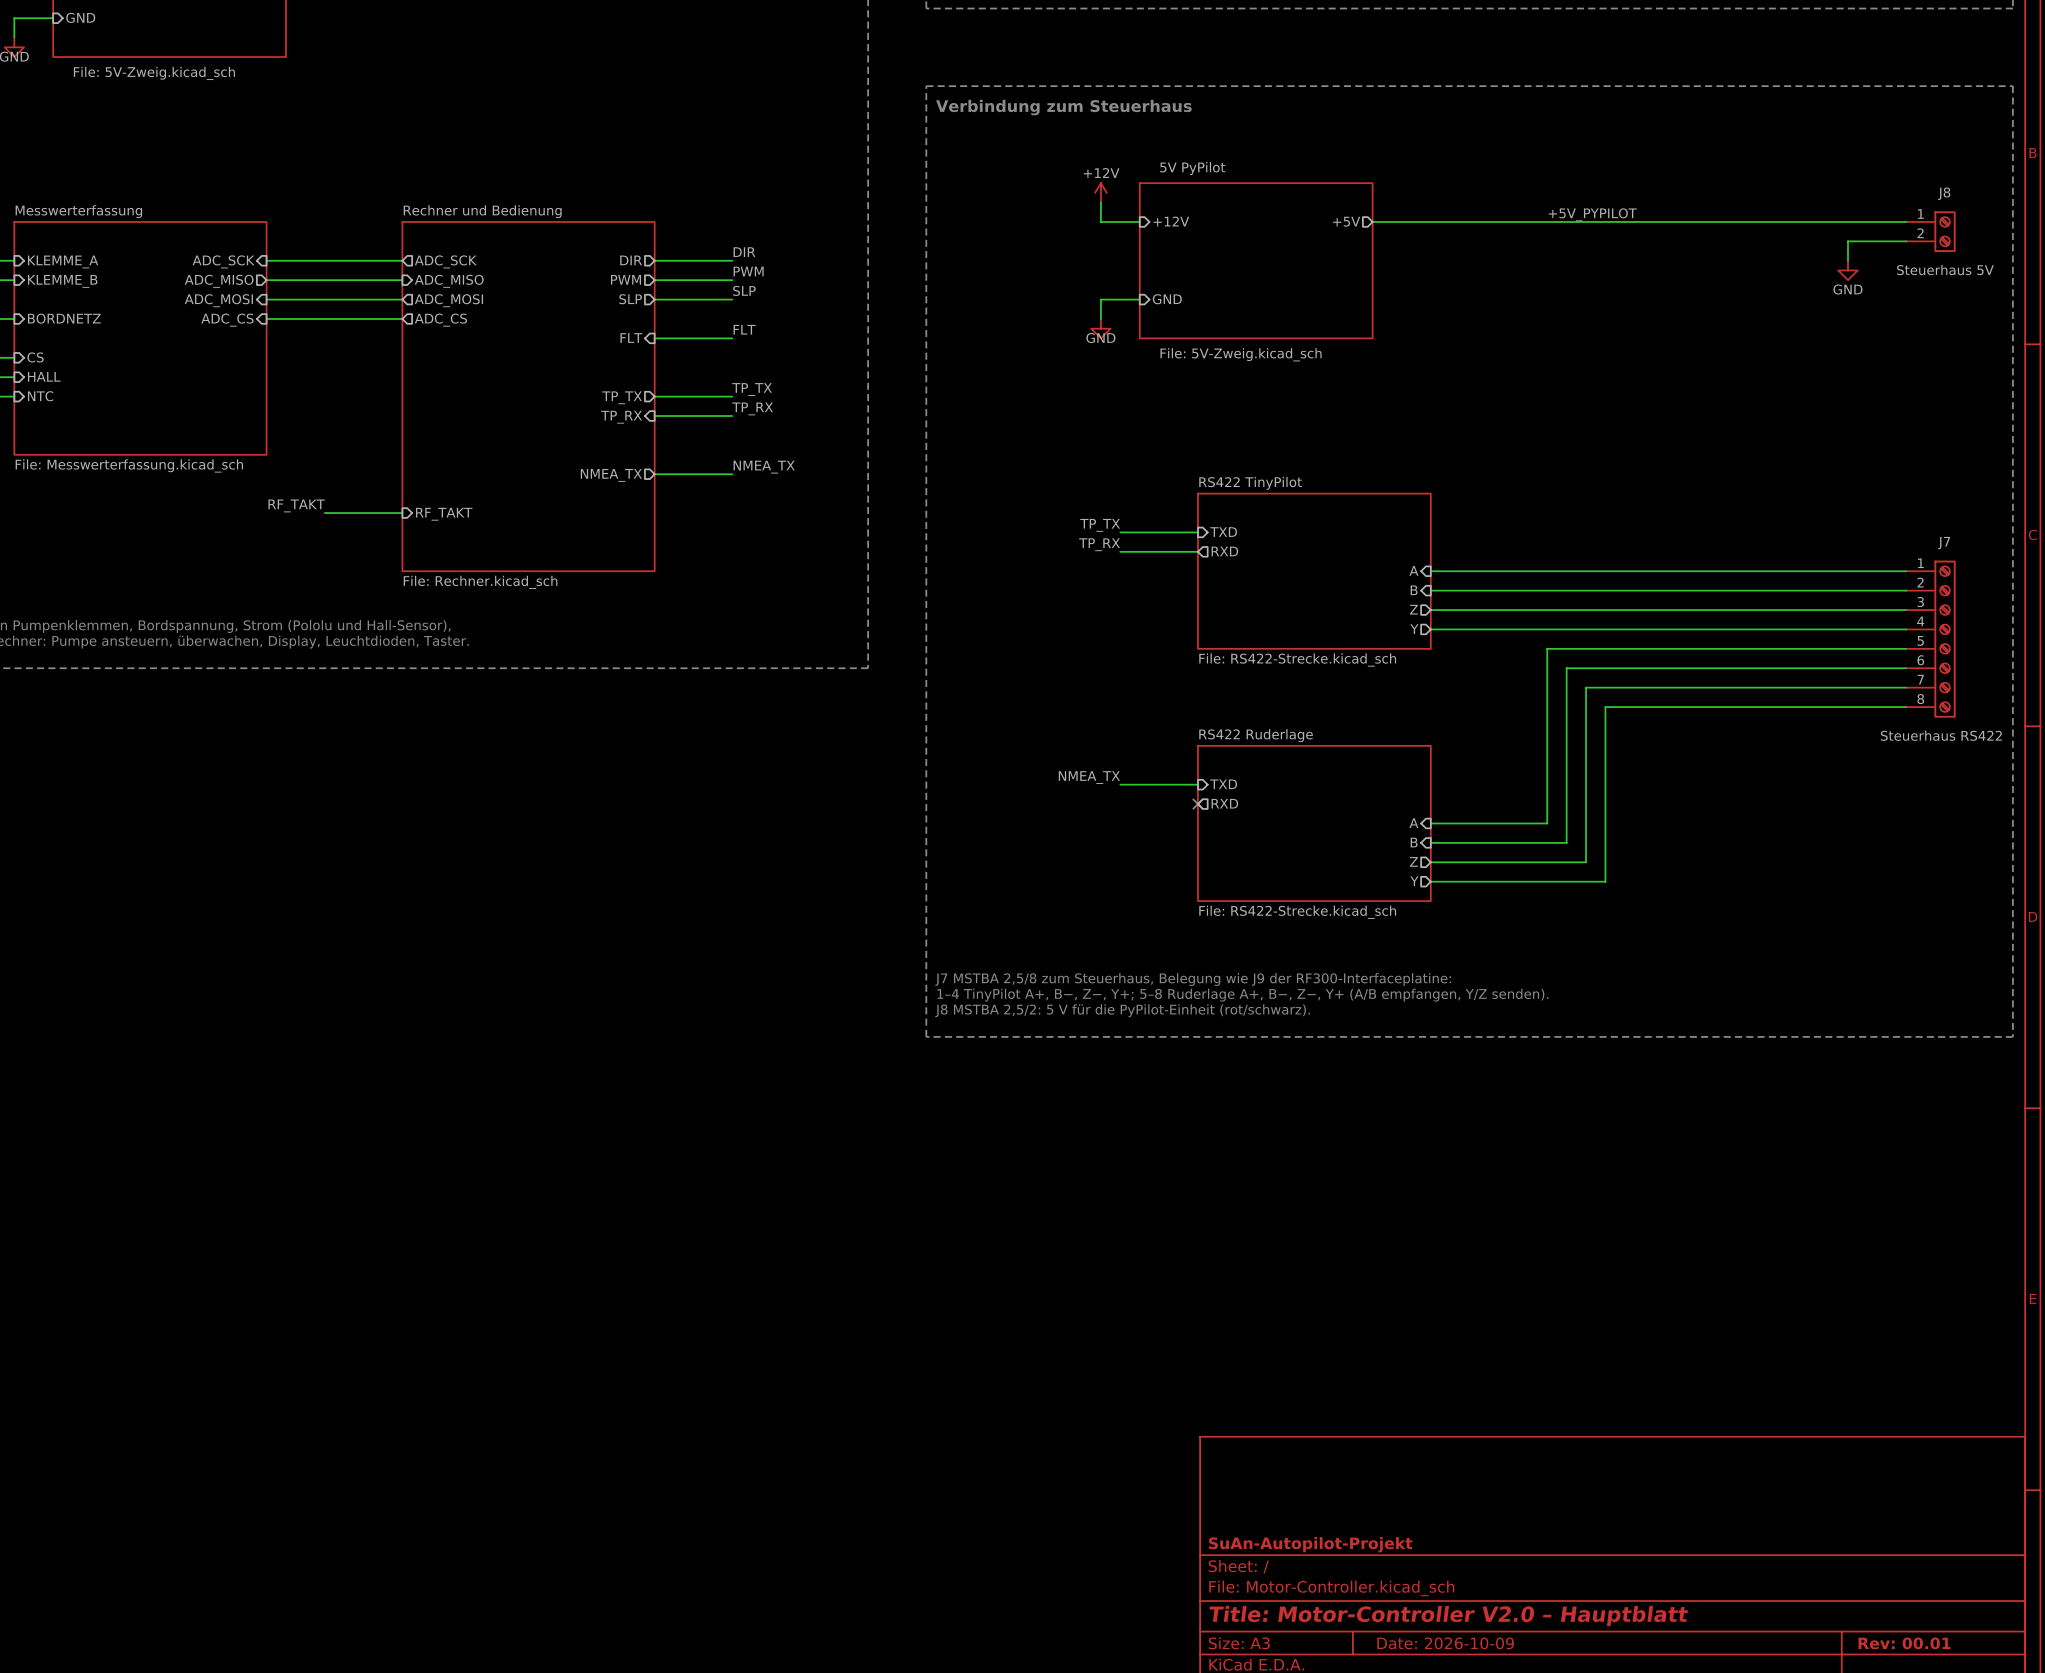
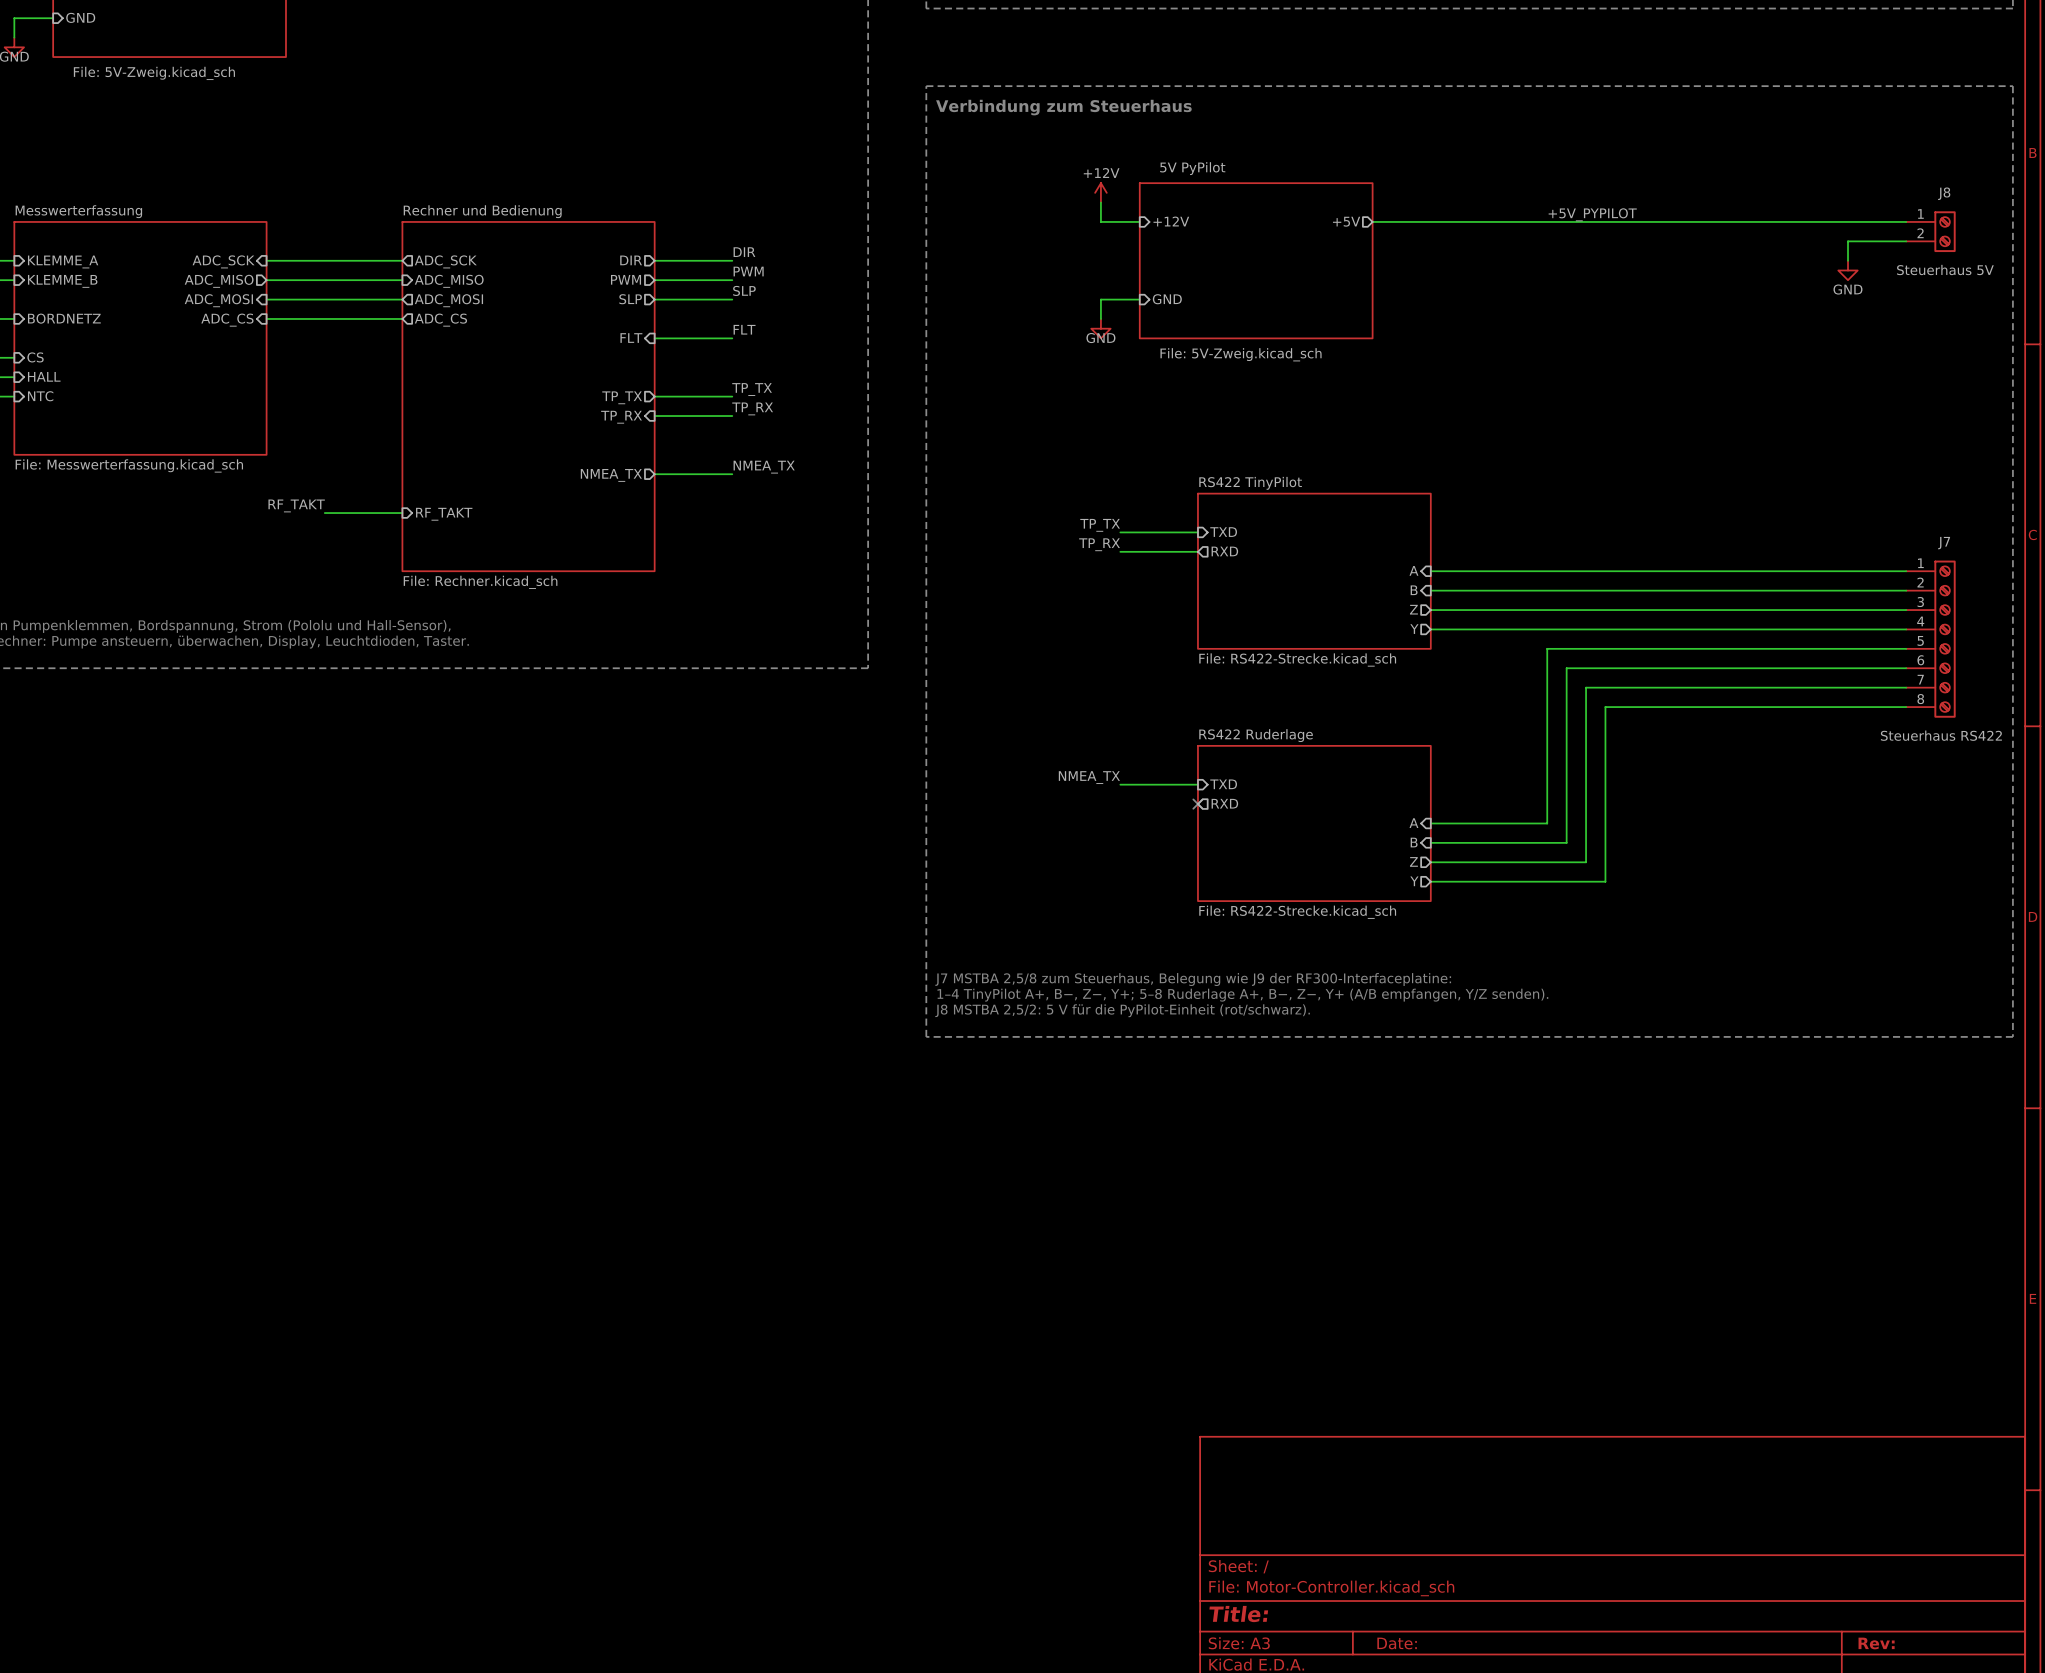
title block: SuAn-Autopilot-Projekt (1310, 1544) -> none
title block: Title: Motor-Controller V2.0 – Hauptblatt (1448, 1616) -> Title: (1238, 1614)
title block: Date: 2026-10-09 (1445, 1643) -> Date: (1397, 1643)
title block: Rev: 00.01 (1904, 1643) -> Rev: (1876, 1643)

